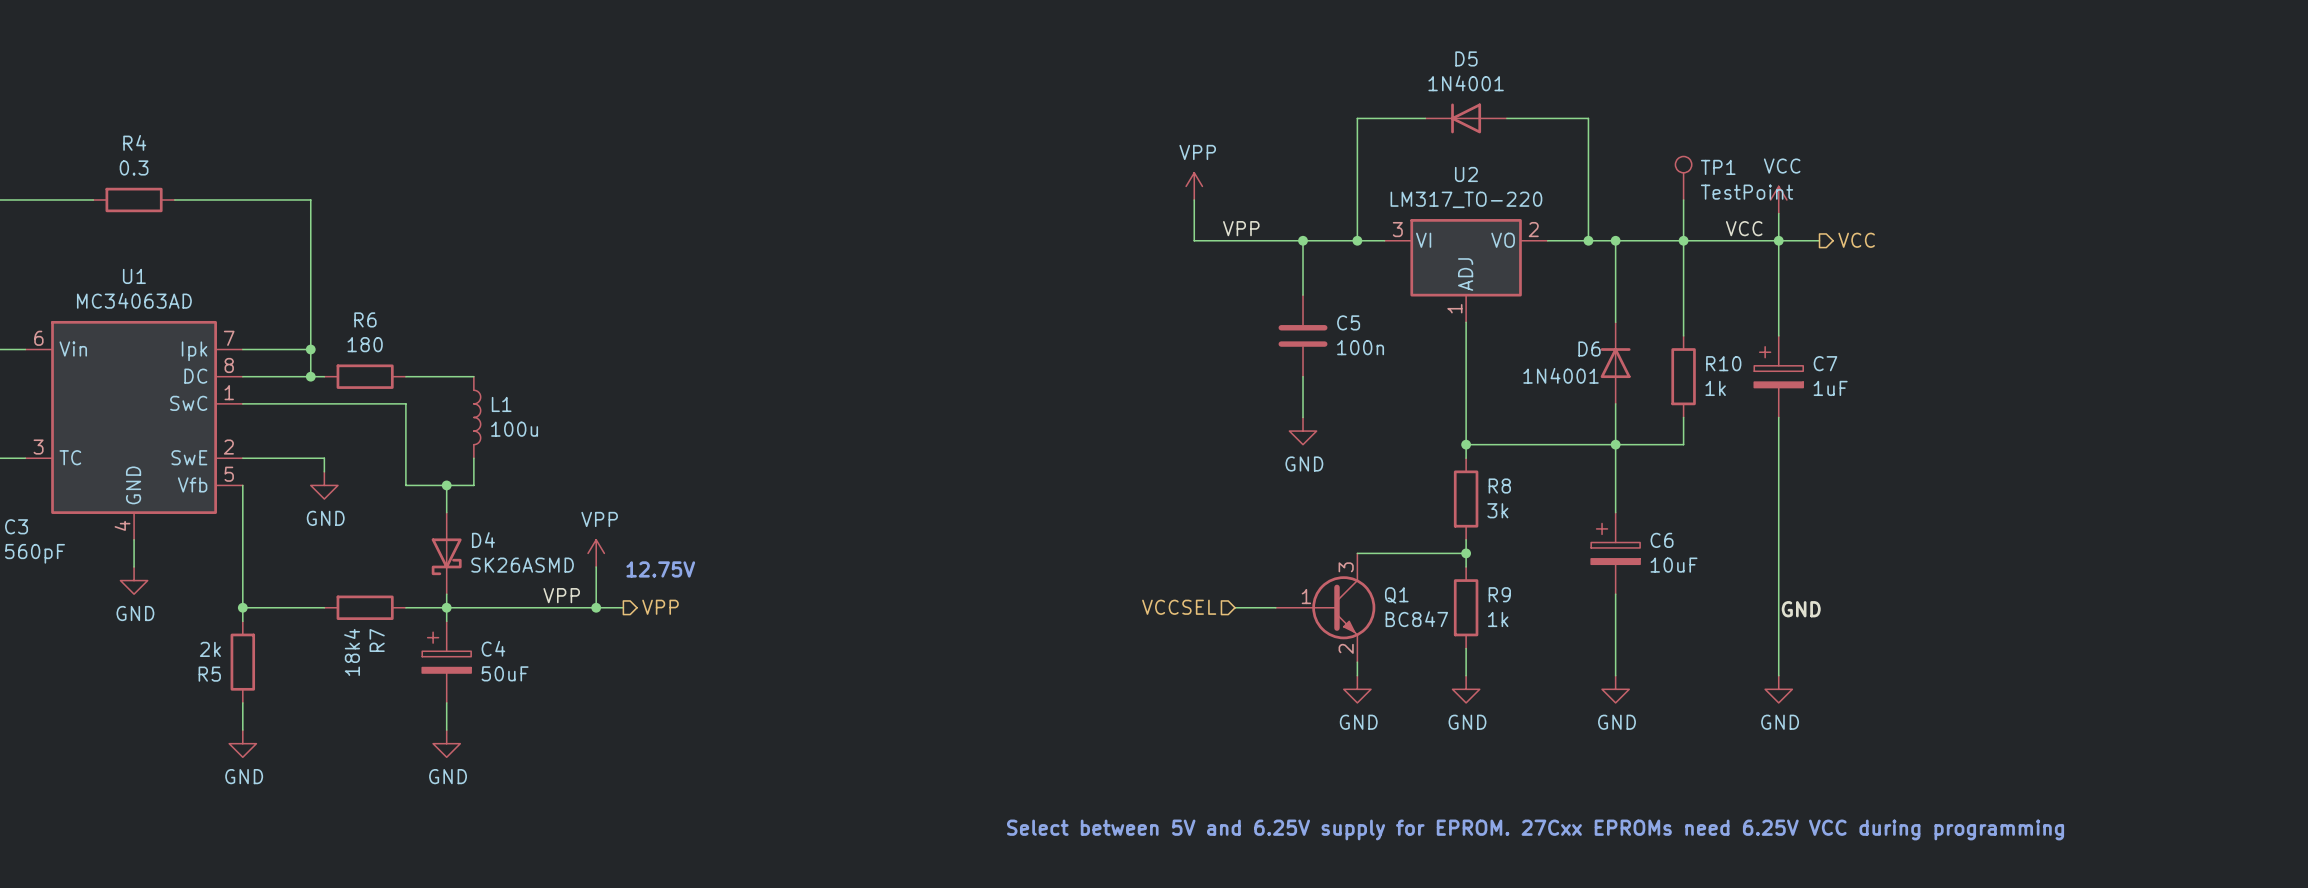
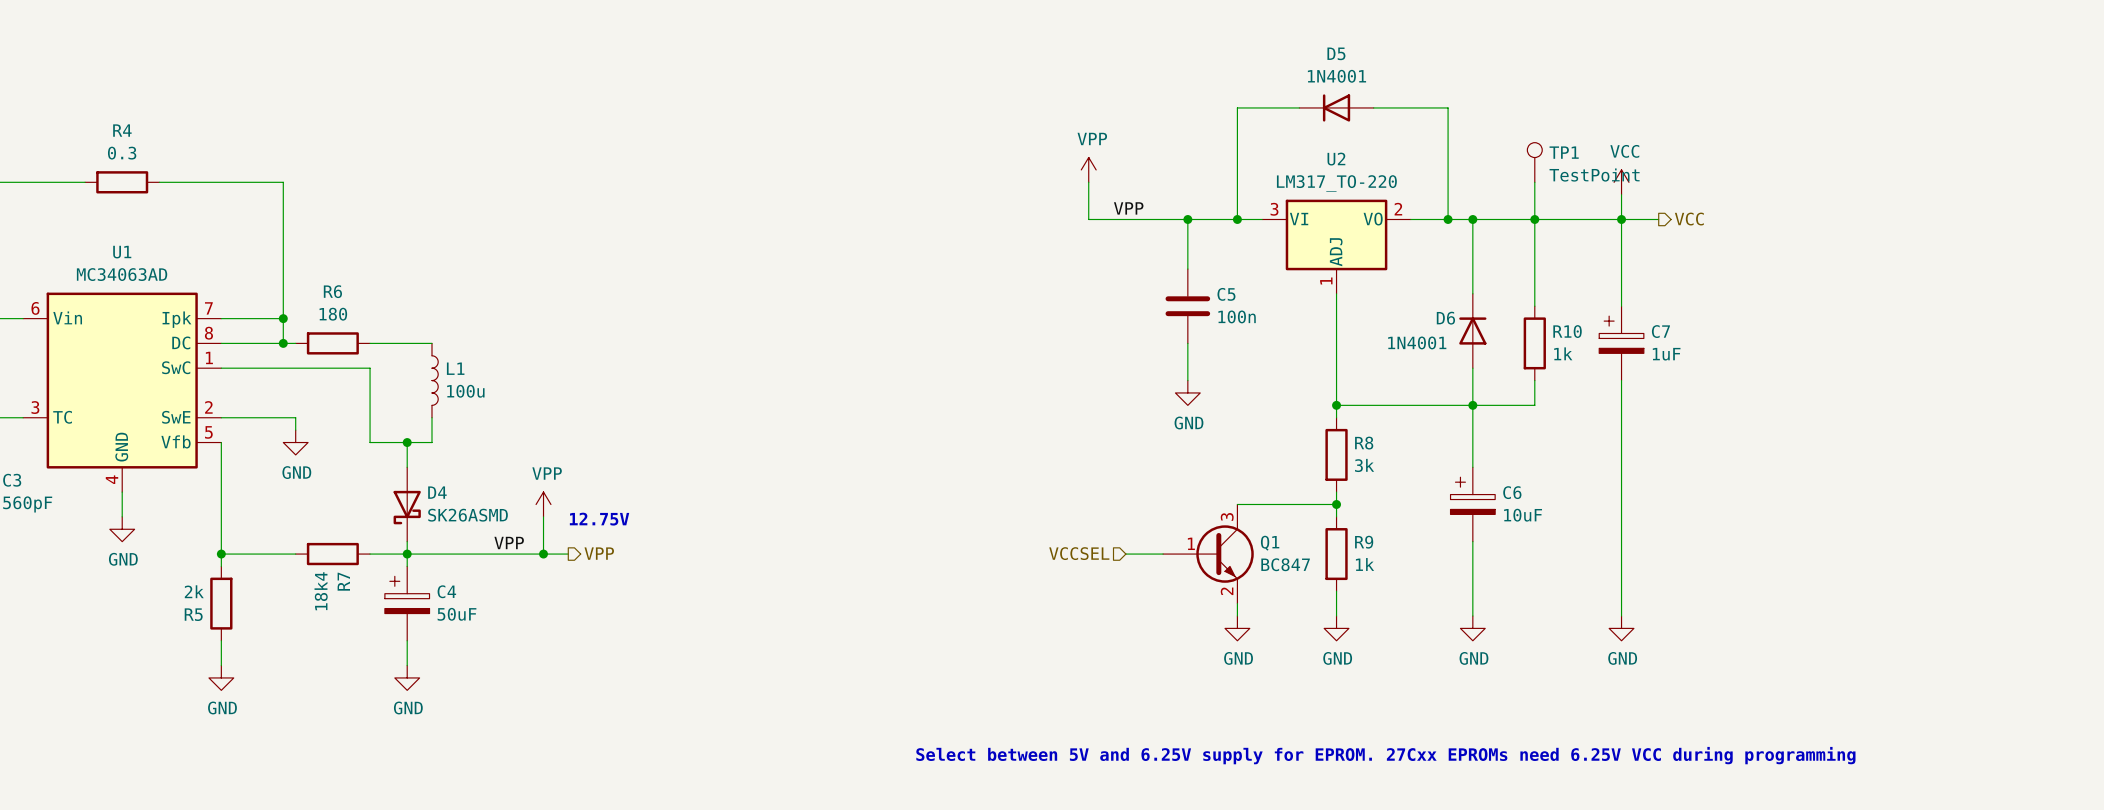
label: VCC (1744, 228) -> none
label: GND (1801, 609) -> none

